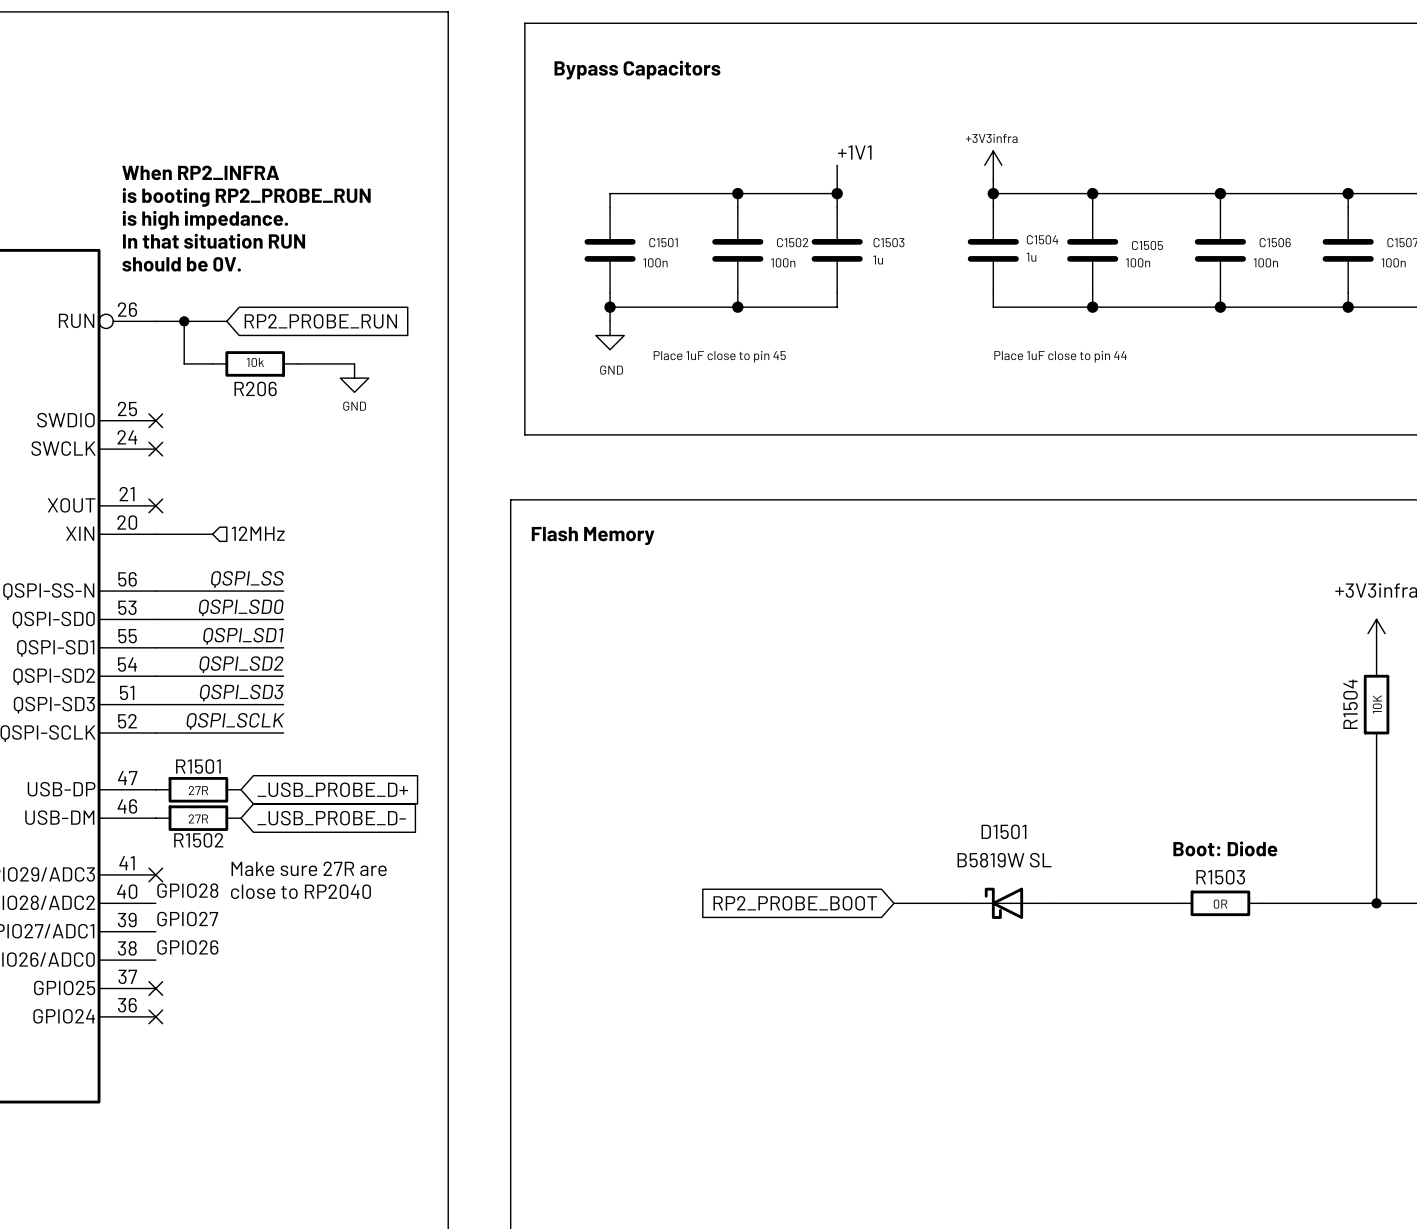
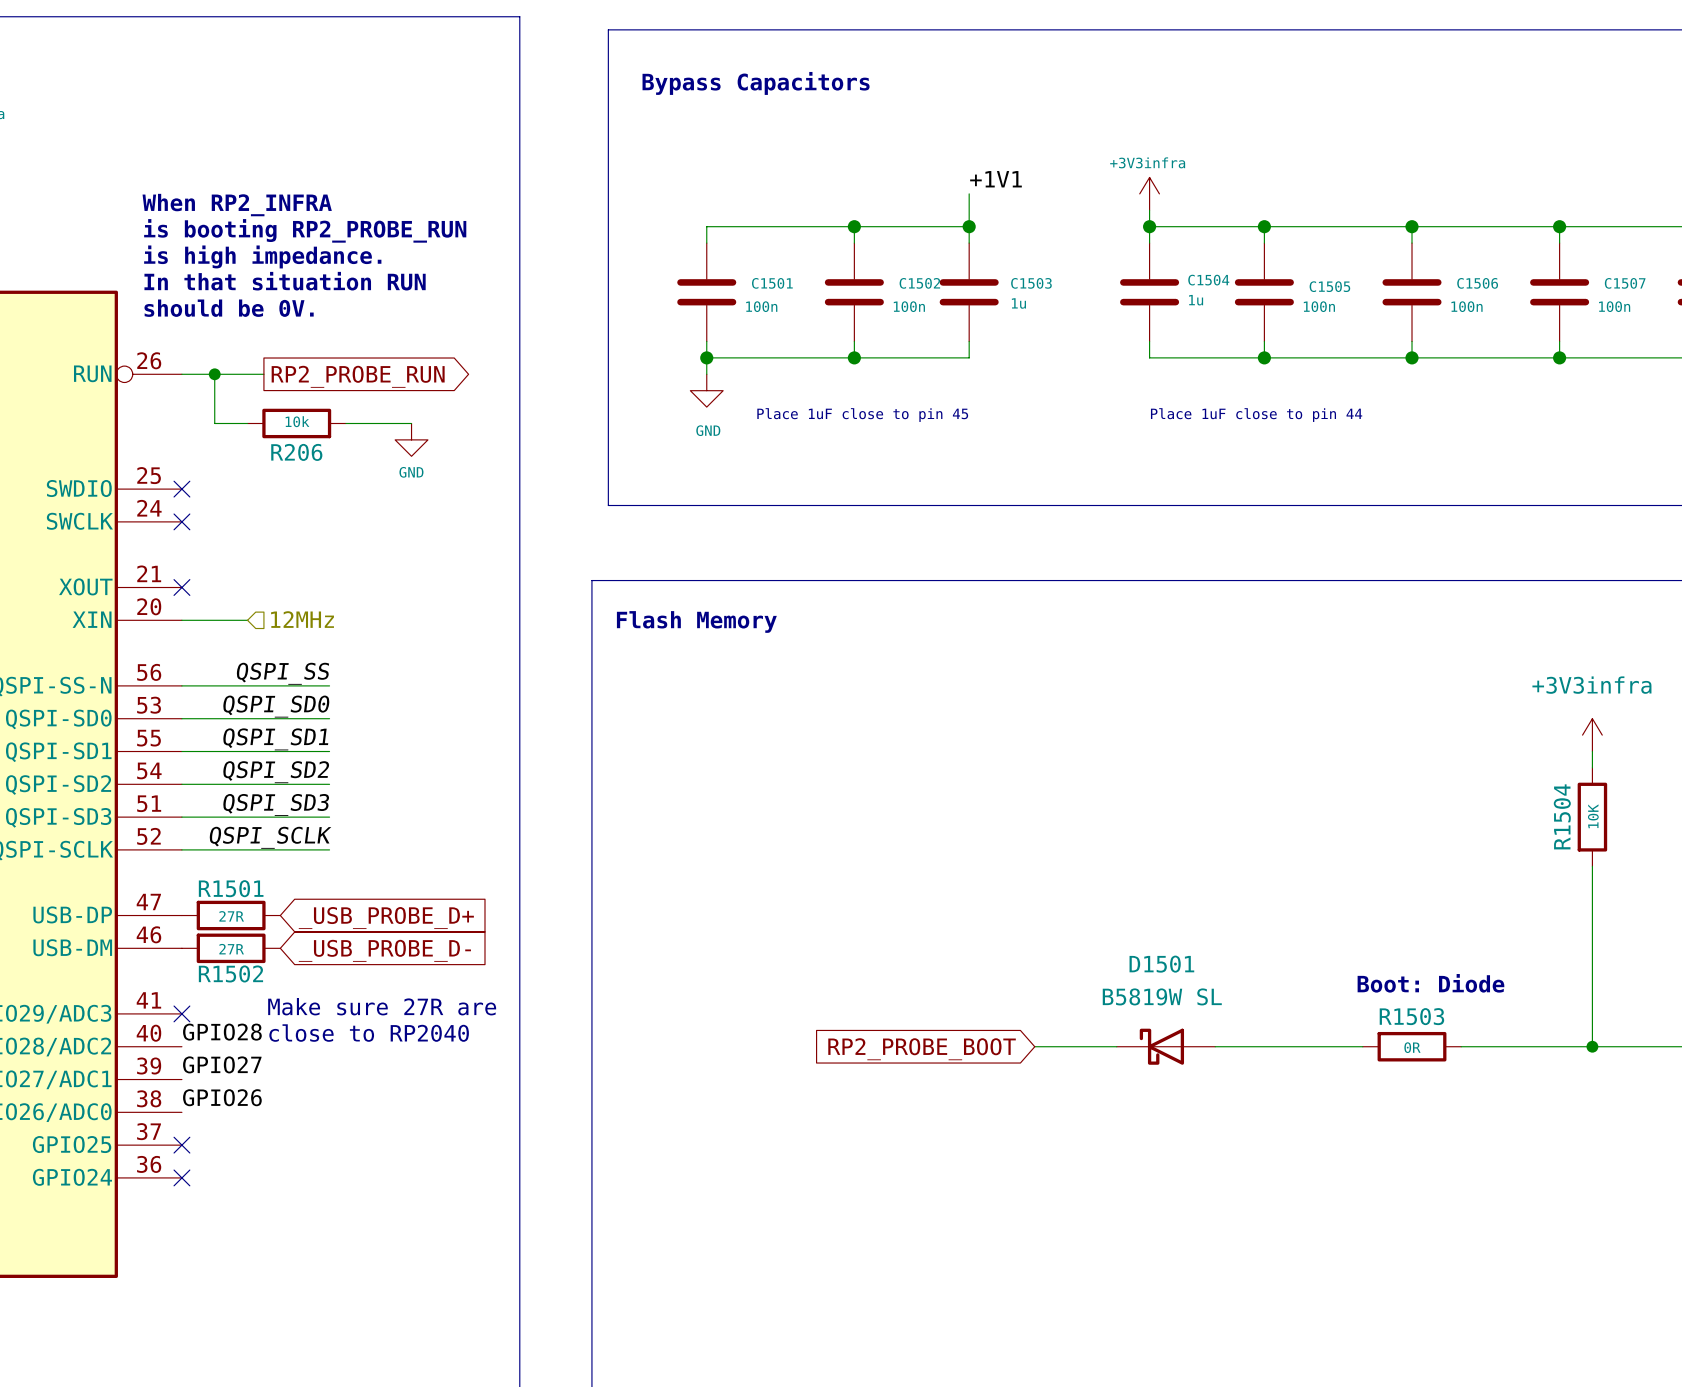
global label shape: input (320, 321) -> output (358, 376)

